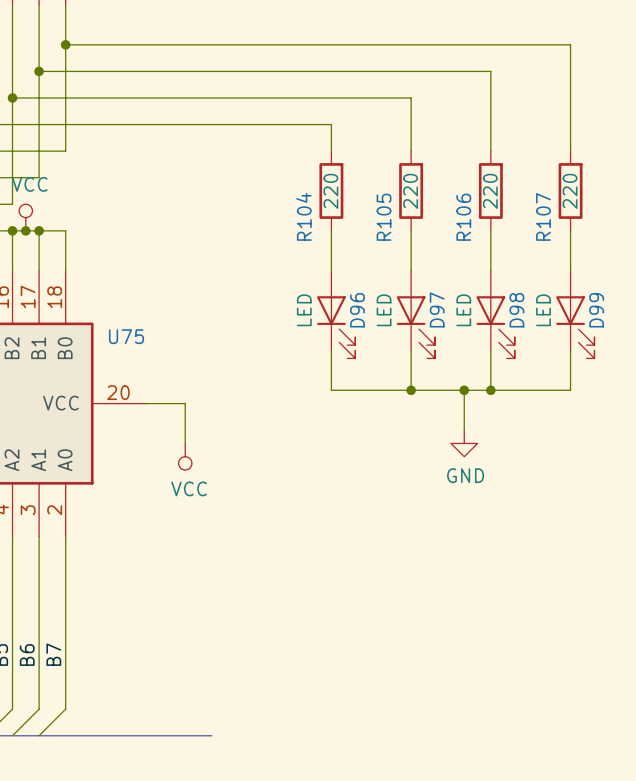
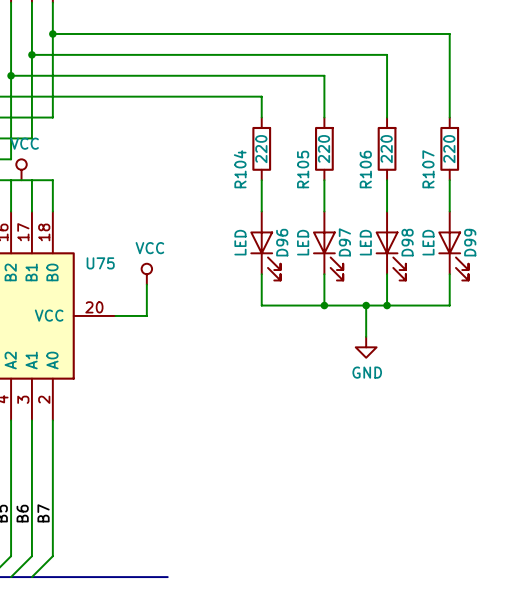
junction: (12, 230) -> none
junction: (25, 230) -> none
junction: (39, 230) -> none
wire: (185, 403) (185, 443) -> (146, 315) (146, 284)
power symbol rotation: 0° (185, 456) -> 180° (146, 274)
power symbol position: VCC (185, 456) -> VCC (146, 274)

